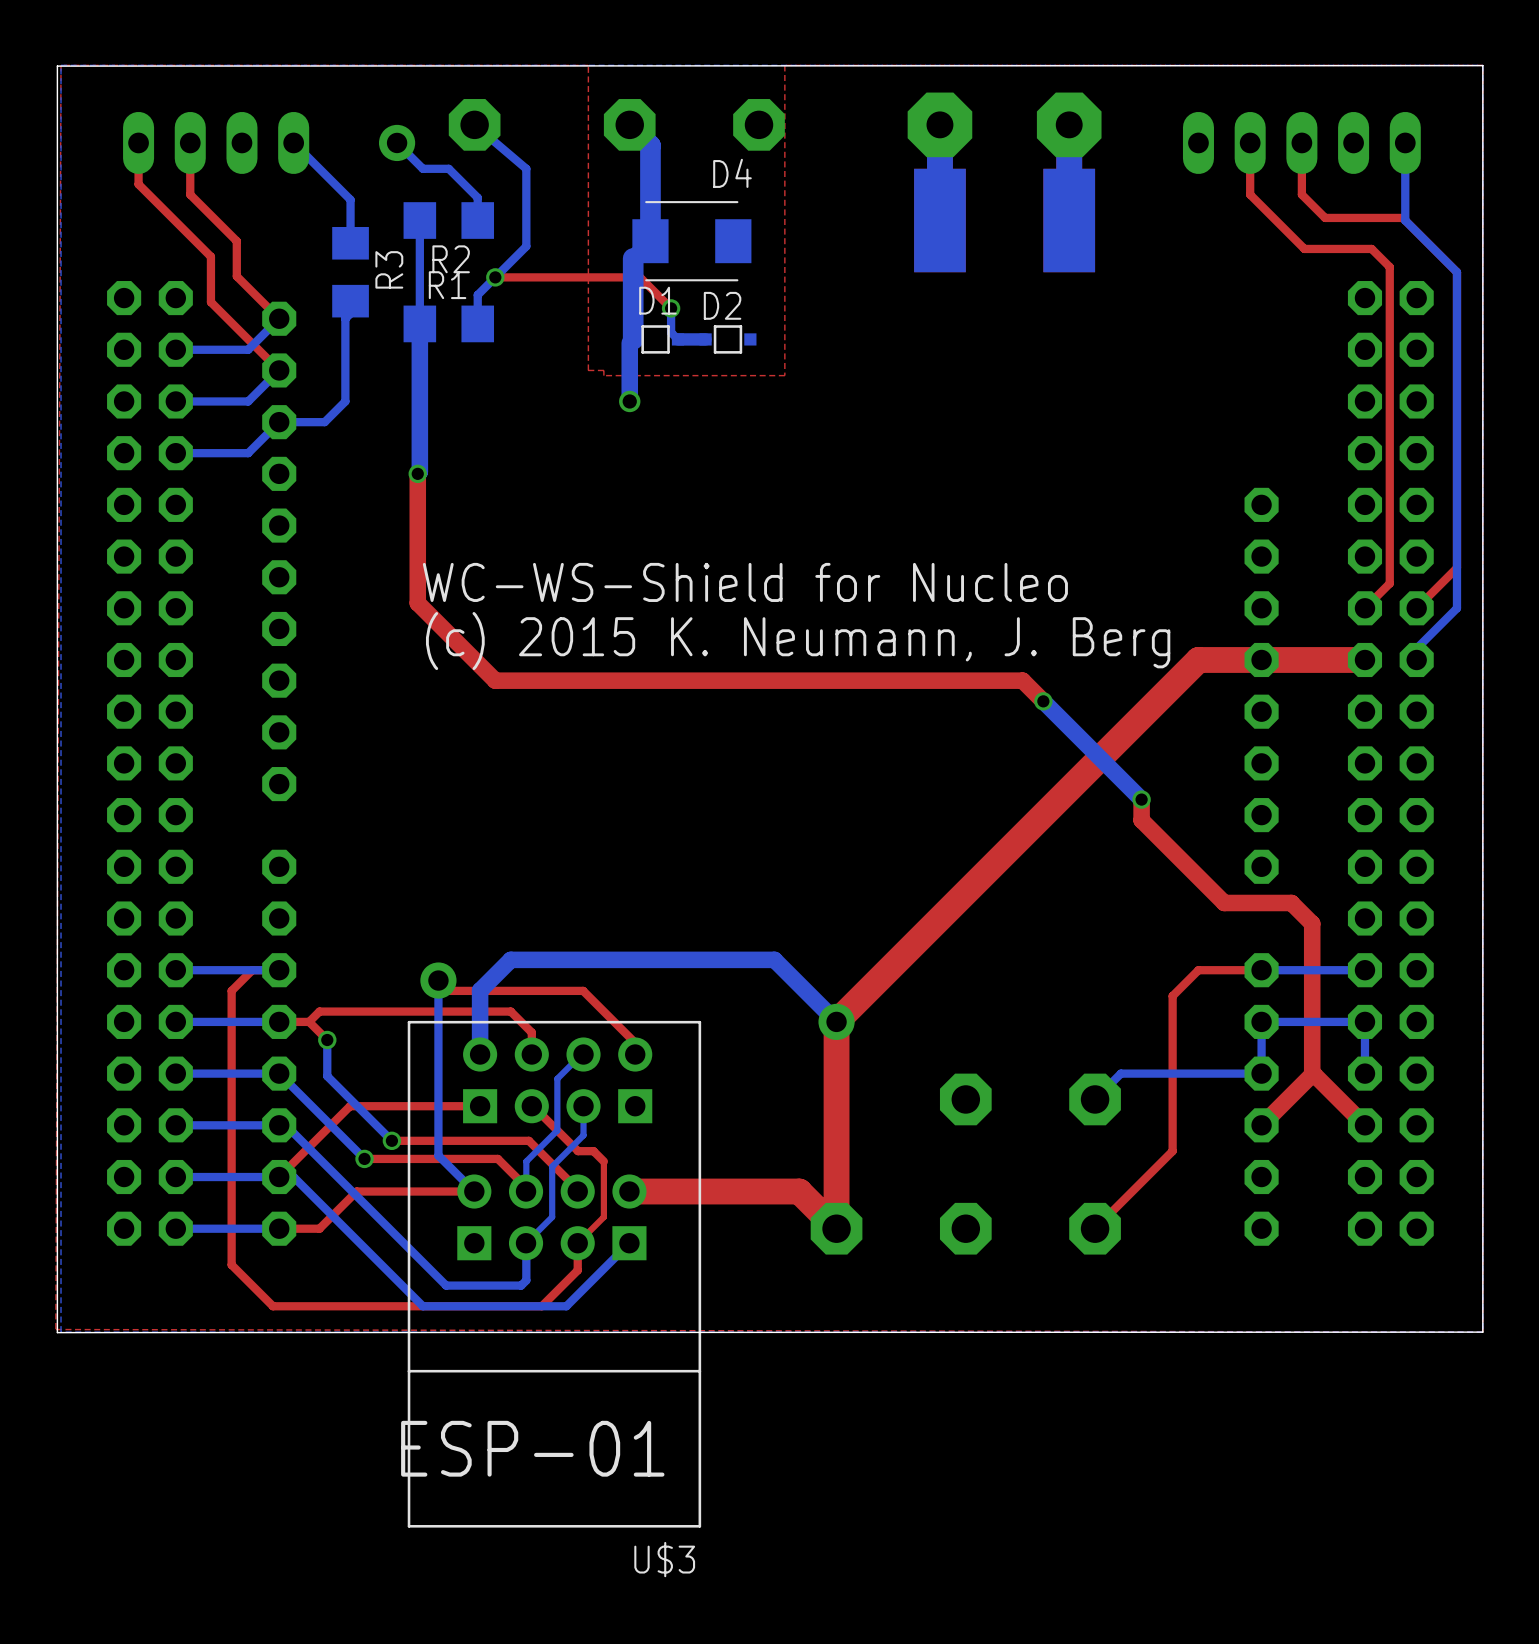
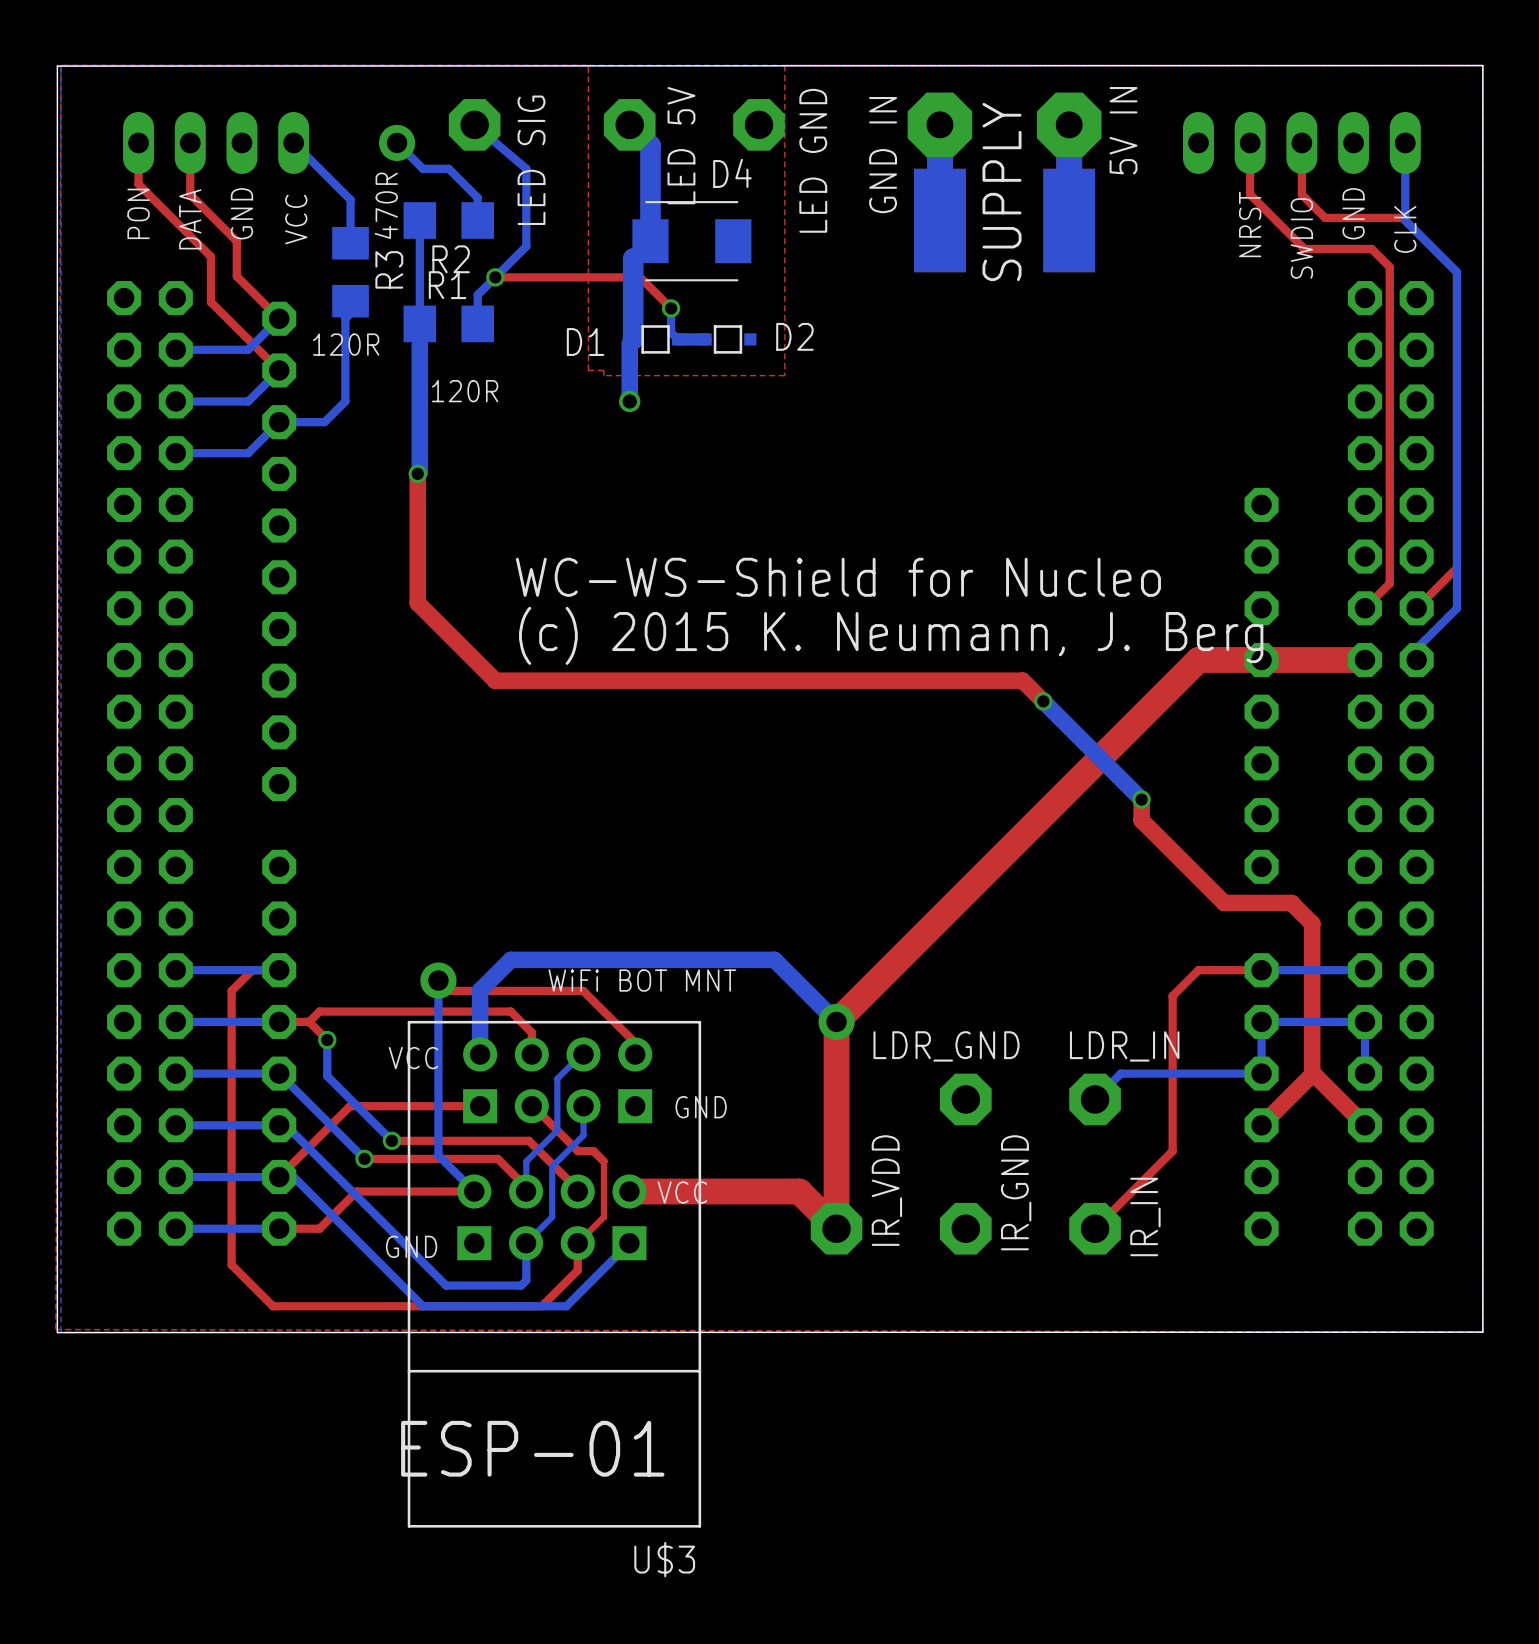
text: none -> 5V IN (1123, 130)
text: none -> LED 5V (681, 145)
text: none -> GND IN (883, 155)
text: none -> LED SIG (531, 160)
text: none -> LED GND (813, 160)
text: none -> SUPPLY (1002, 191)
text: none -> 470R (386, 205)
text: none -> PON (138, 213)
text: none -> GND (241, 213)
text: none -> GND (1353, 213)
text: none -> DATA (190, 219)
text: none -> VCC (296, 219)
text: none -> NRST (1250, 224)
text: none -> CLK (1405, 229)
text: none -> SWDIO (1301, 238)
D1 name position: D1 (657, 300) -> D1 (585, 342)
D2 name position: D2 (722, 305) -> D2 (794, 336)
text: none -> 120R (346, 344)
text: none -> 120R (465, 391)
text position: WC-WS-Shield for Nucleo (745, 582) -> WC-WS-Shield for Nucleo (838, 577)
text position: (c) 2015 K. Neumann, J. Berg (798, 641) -> (c) 2015 K. Neumann, J. Berg (891, 635)
text: none -> WiFi BOT MNT (642, 980)
text: none -> LDR_GND (946, 1046)
text: none -> LDR_IN (1124, 1046)
text: none -> VCC (413, 1058)
text: none -> GND (701, 1107)
text: none -> IR_VDD (886, 1190)
text: none -> VCC (682, 1192)
text: none -> IR_GND (1016, 1192)
text: none -> IR_IN (1145, 1216)
text: none -> GND (411, 1246)

